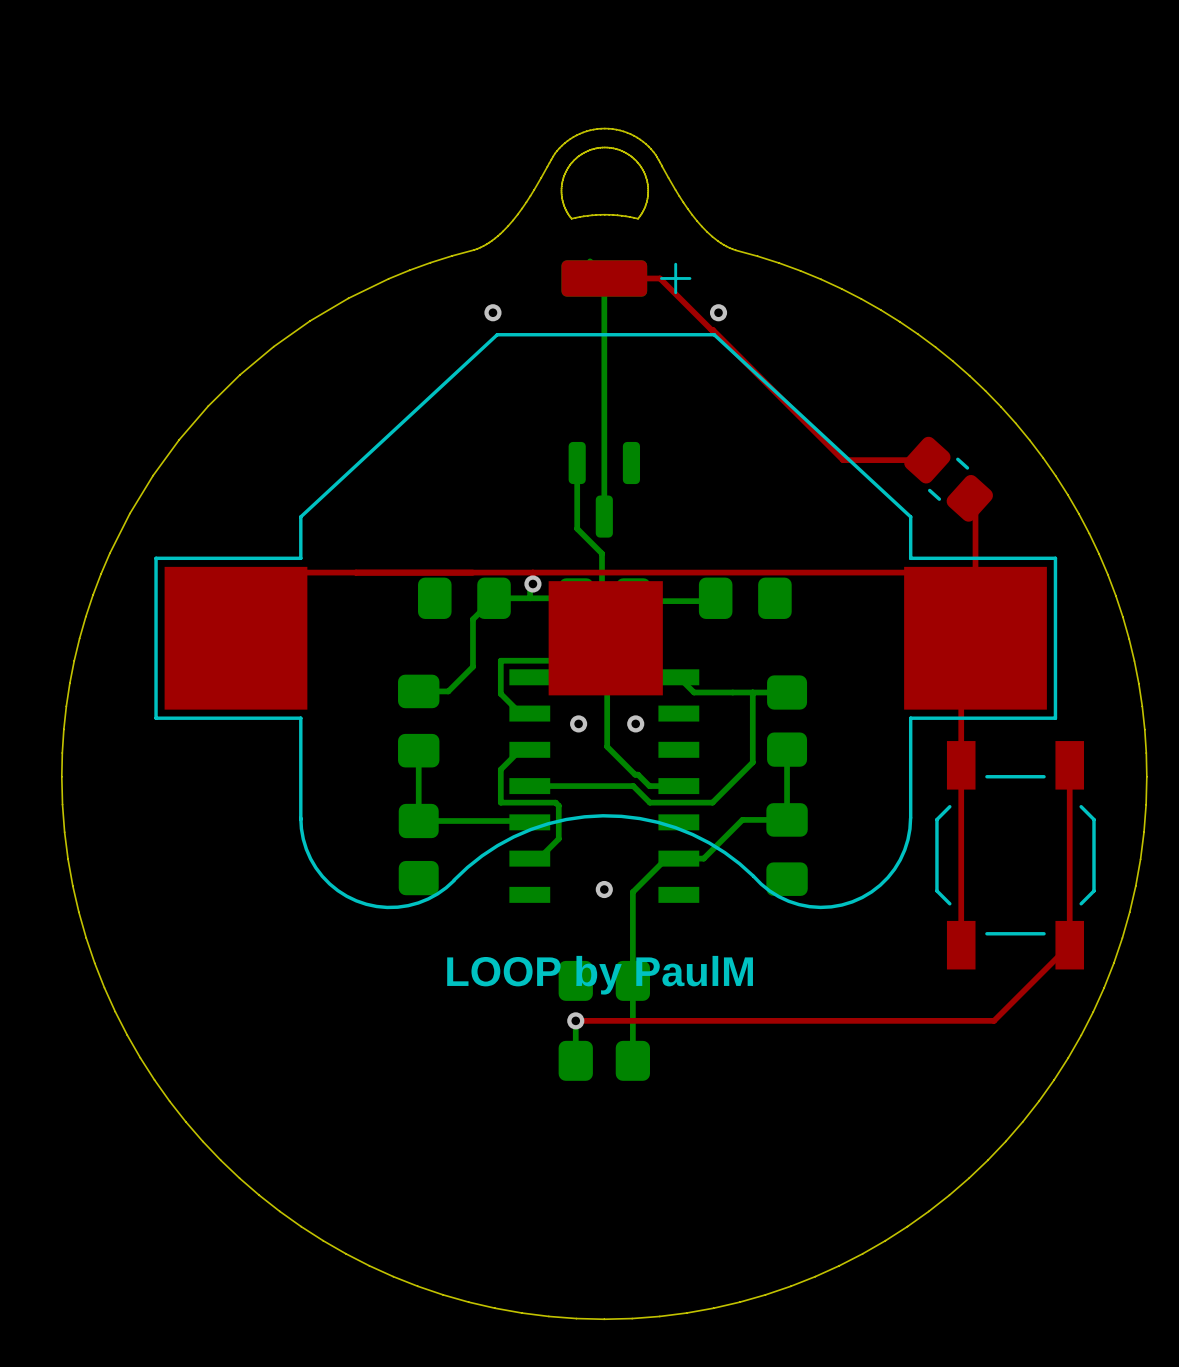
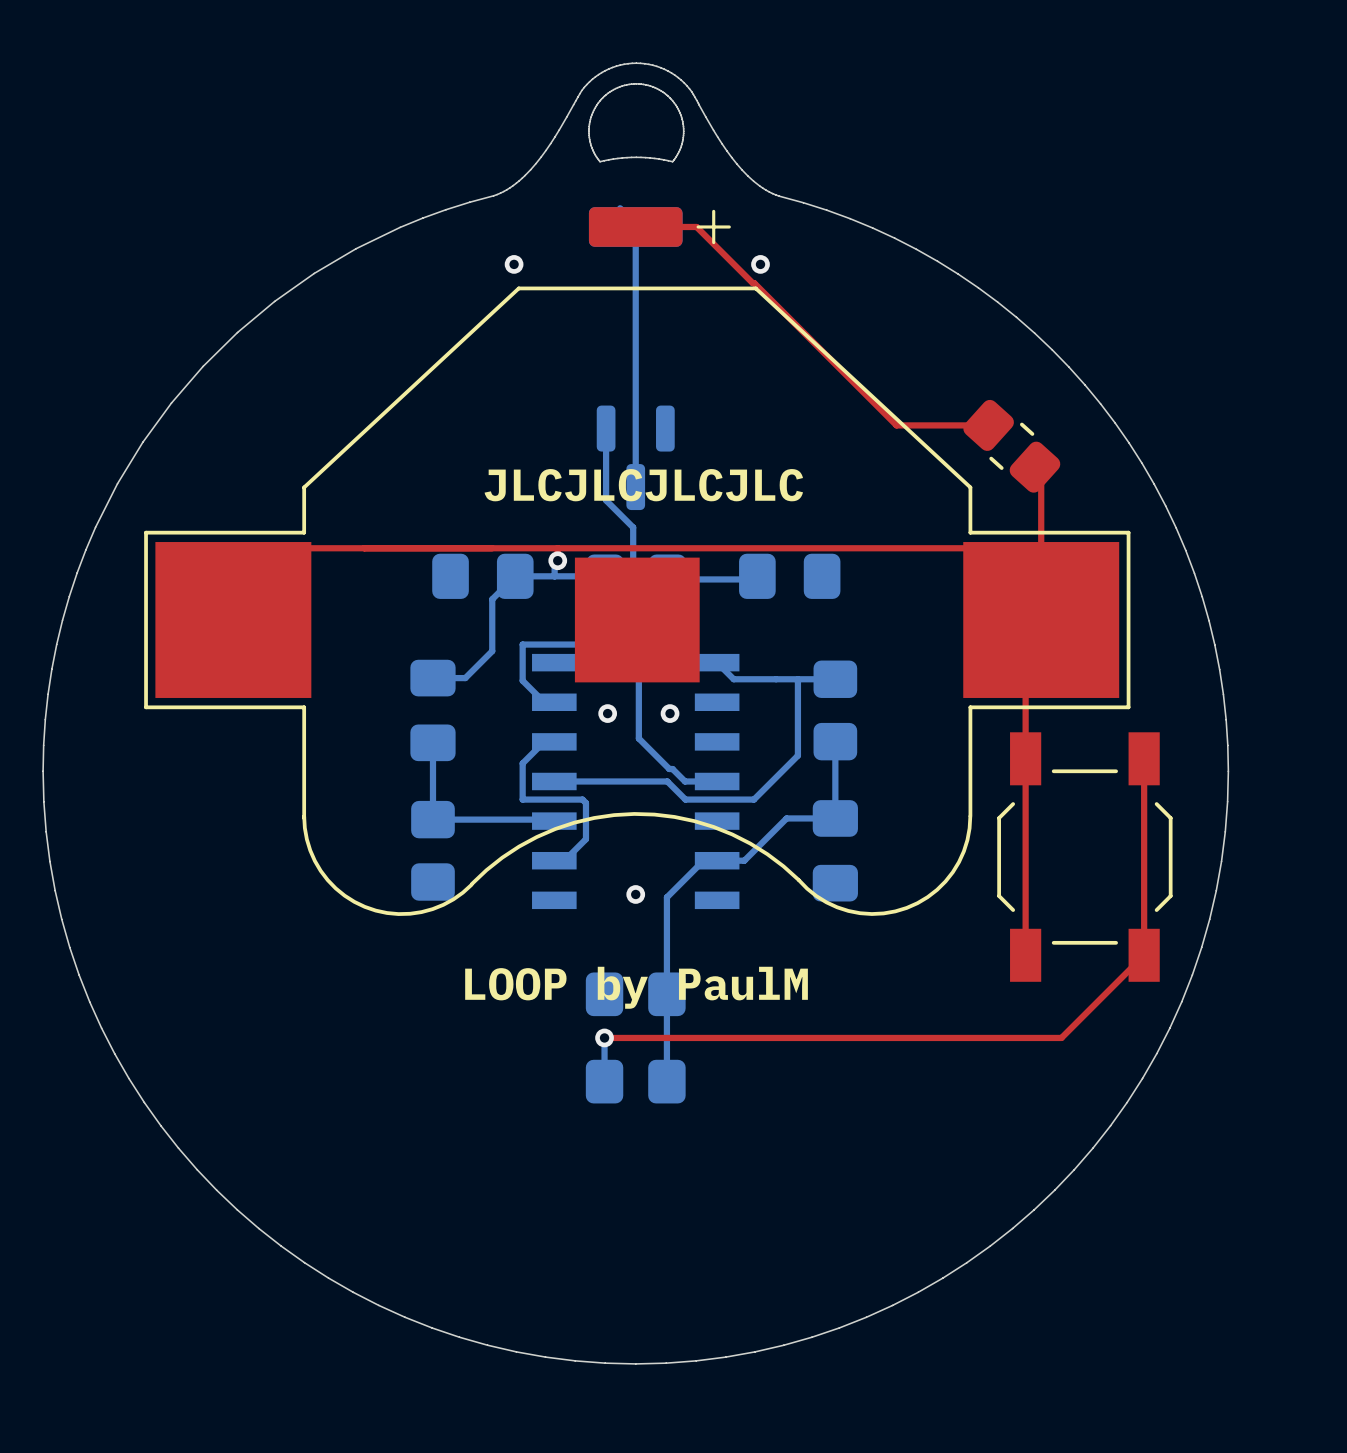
text: none -> JLCJLCJLCJLC (643, 485)

